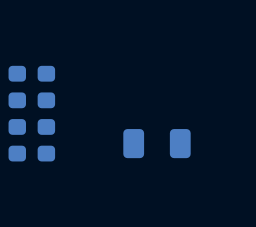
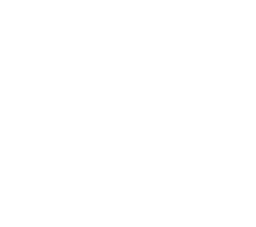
part: (31, 73) -> none
part: (31, 100) -> none
part: (31, 126) -> none
part: (156, 143) -> none
part: (31, 153) -> none

